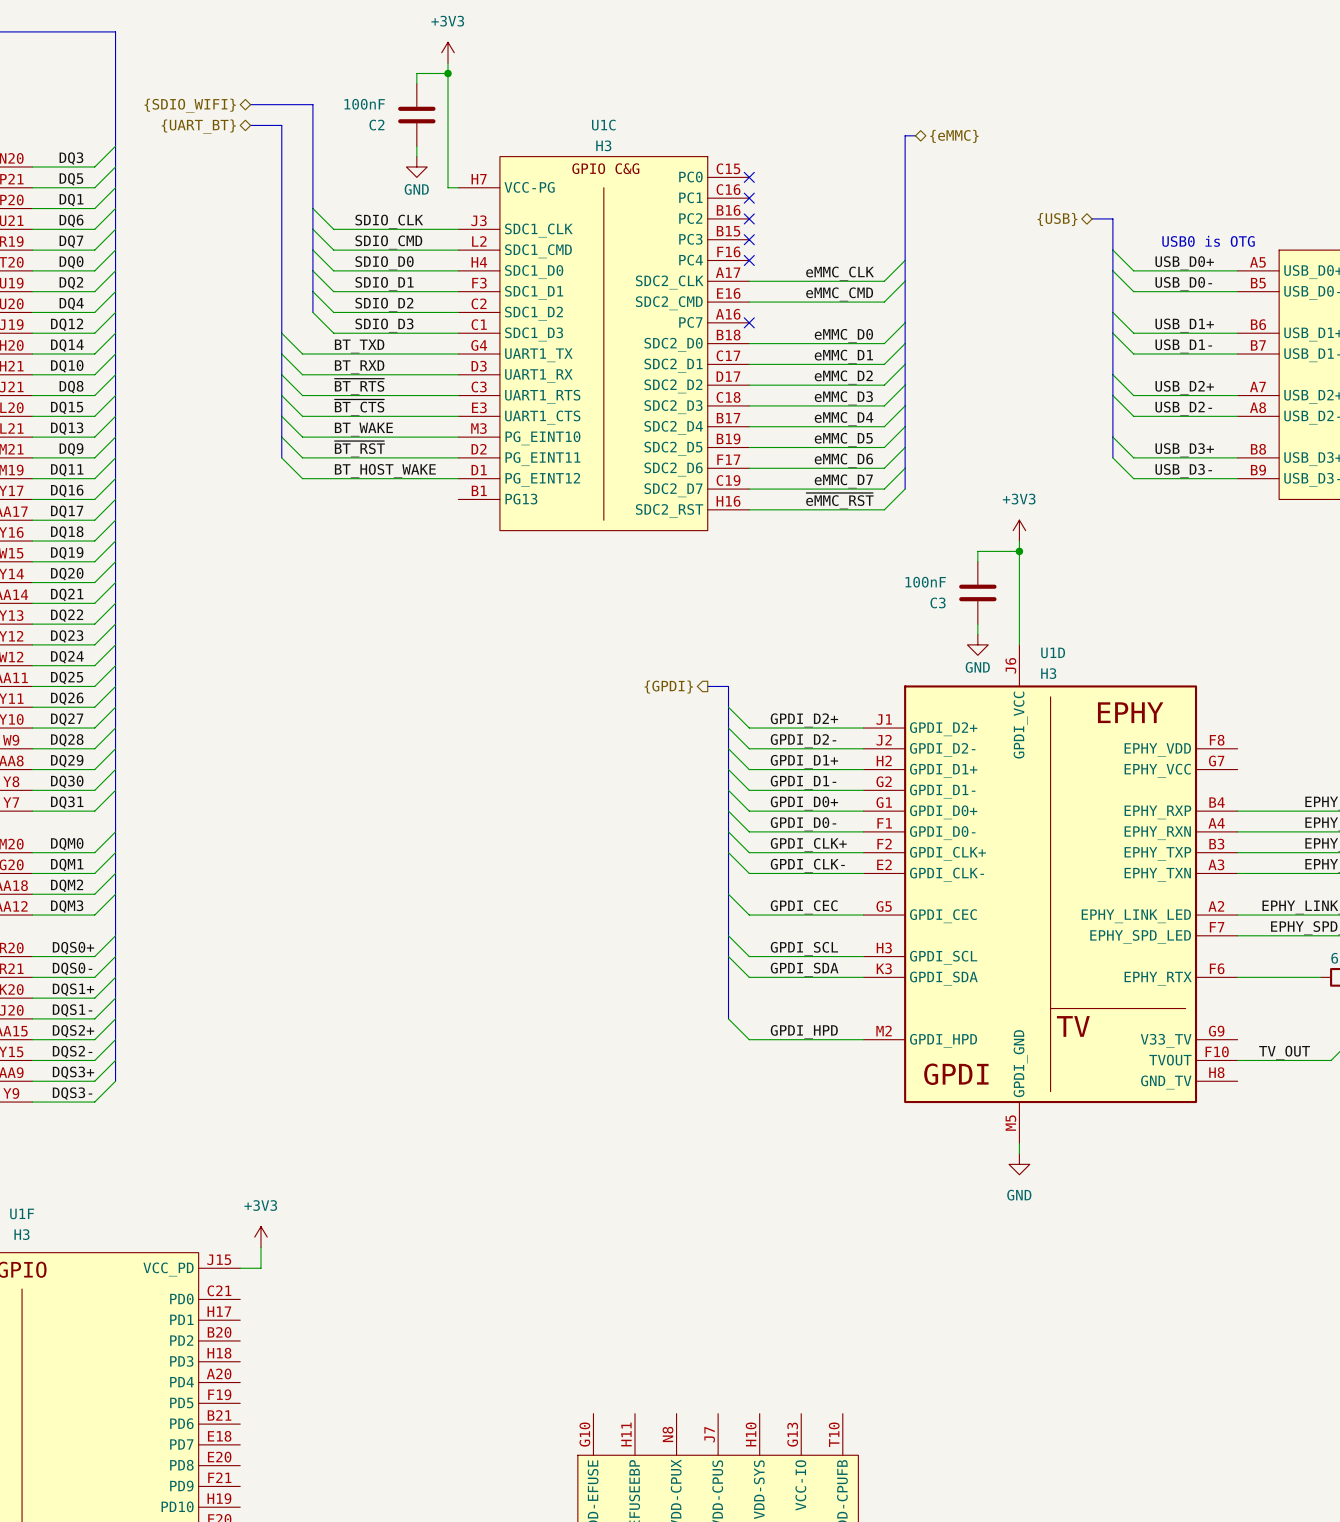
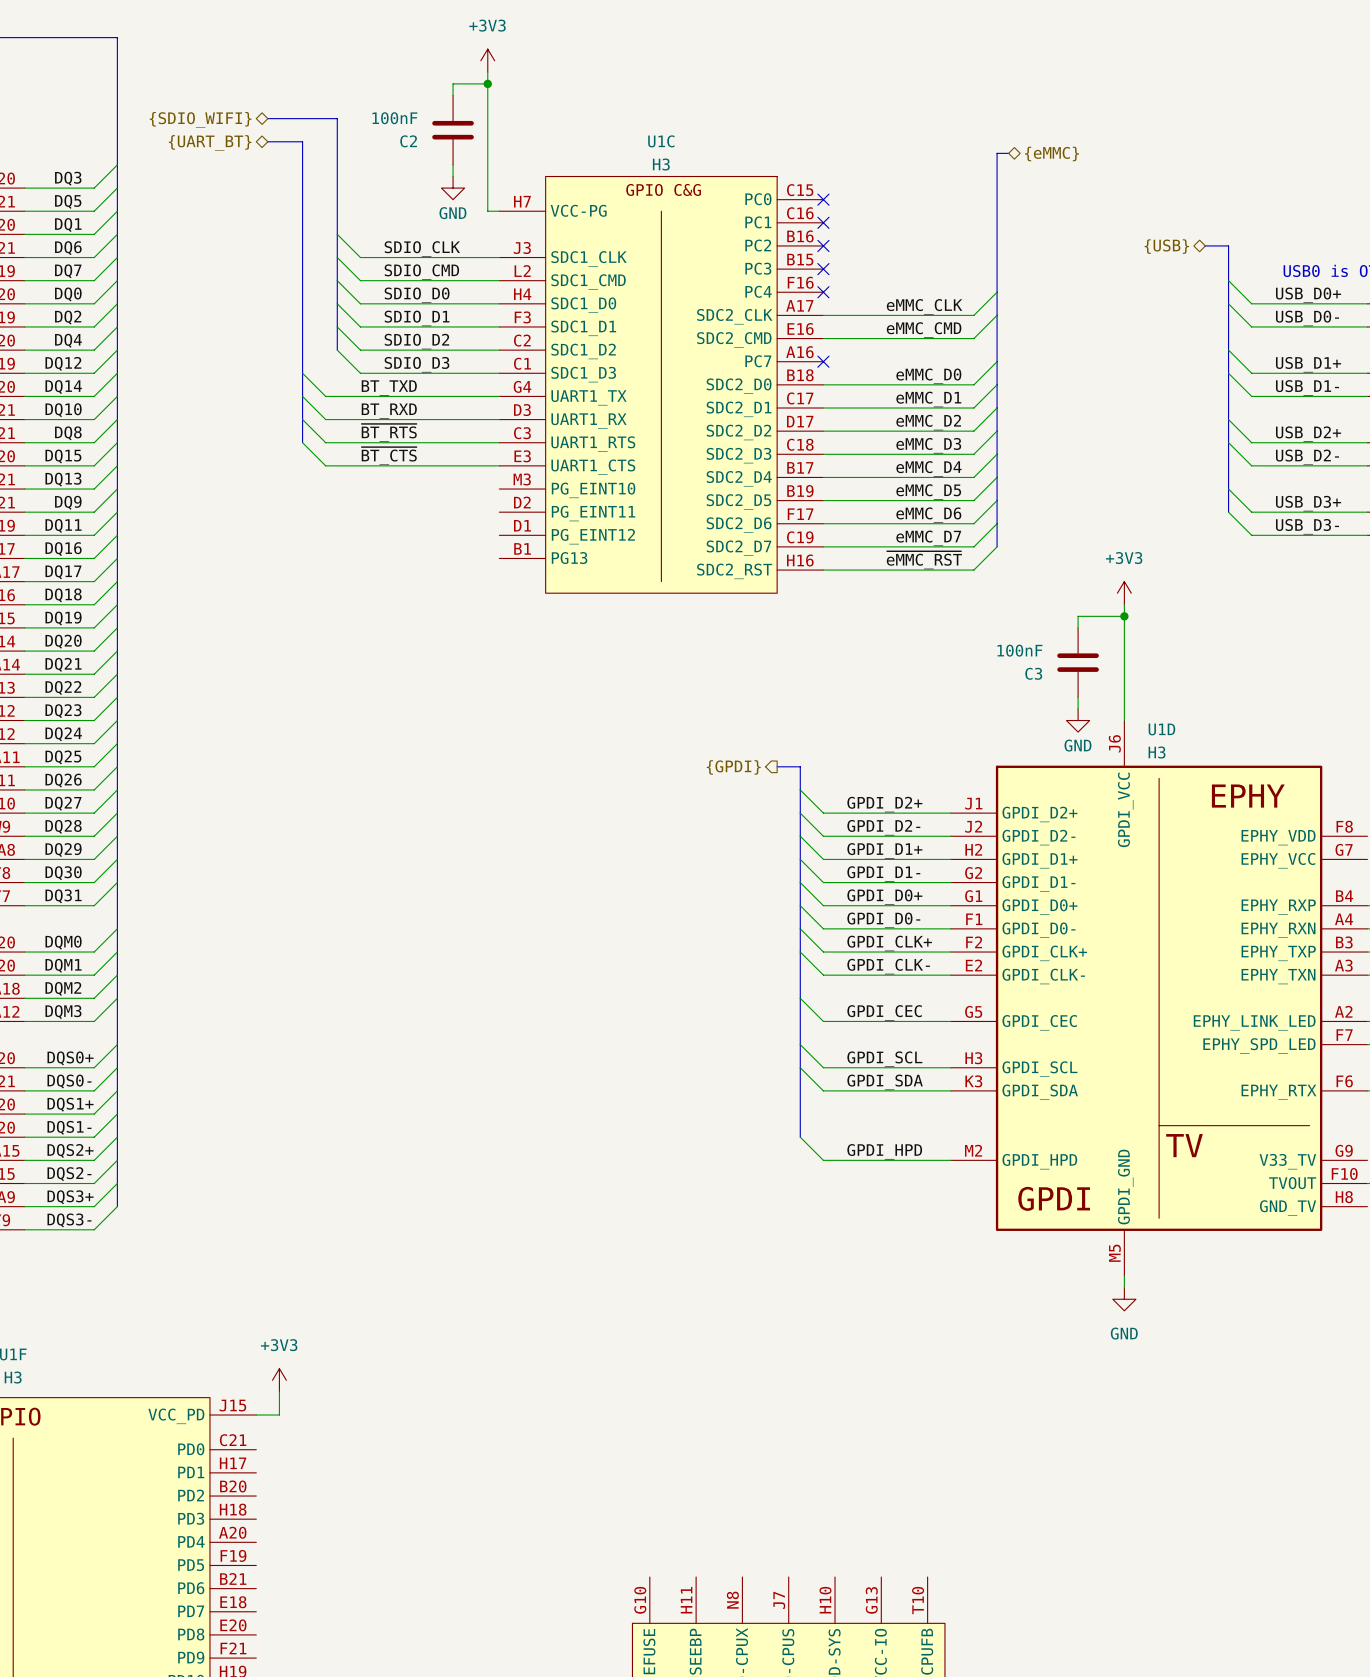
bus: (281, 395) (281, 457) -> none
wire: (281, 416) (302, 437) (458, 437) -> none
label: BT_WAKE (363, 429) -> none
wire: (281, 437) (302, 457) (458, 457) -> none
label: ~{BT_RST} (359, 449) -> none
wire: (281, 457) (302, 478) (458, 478) -> none
label: BT_HOST_WAKE (385, 470) -> none

